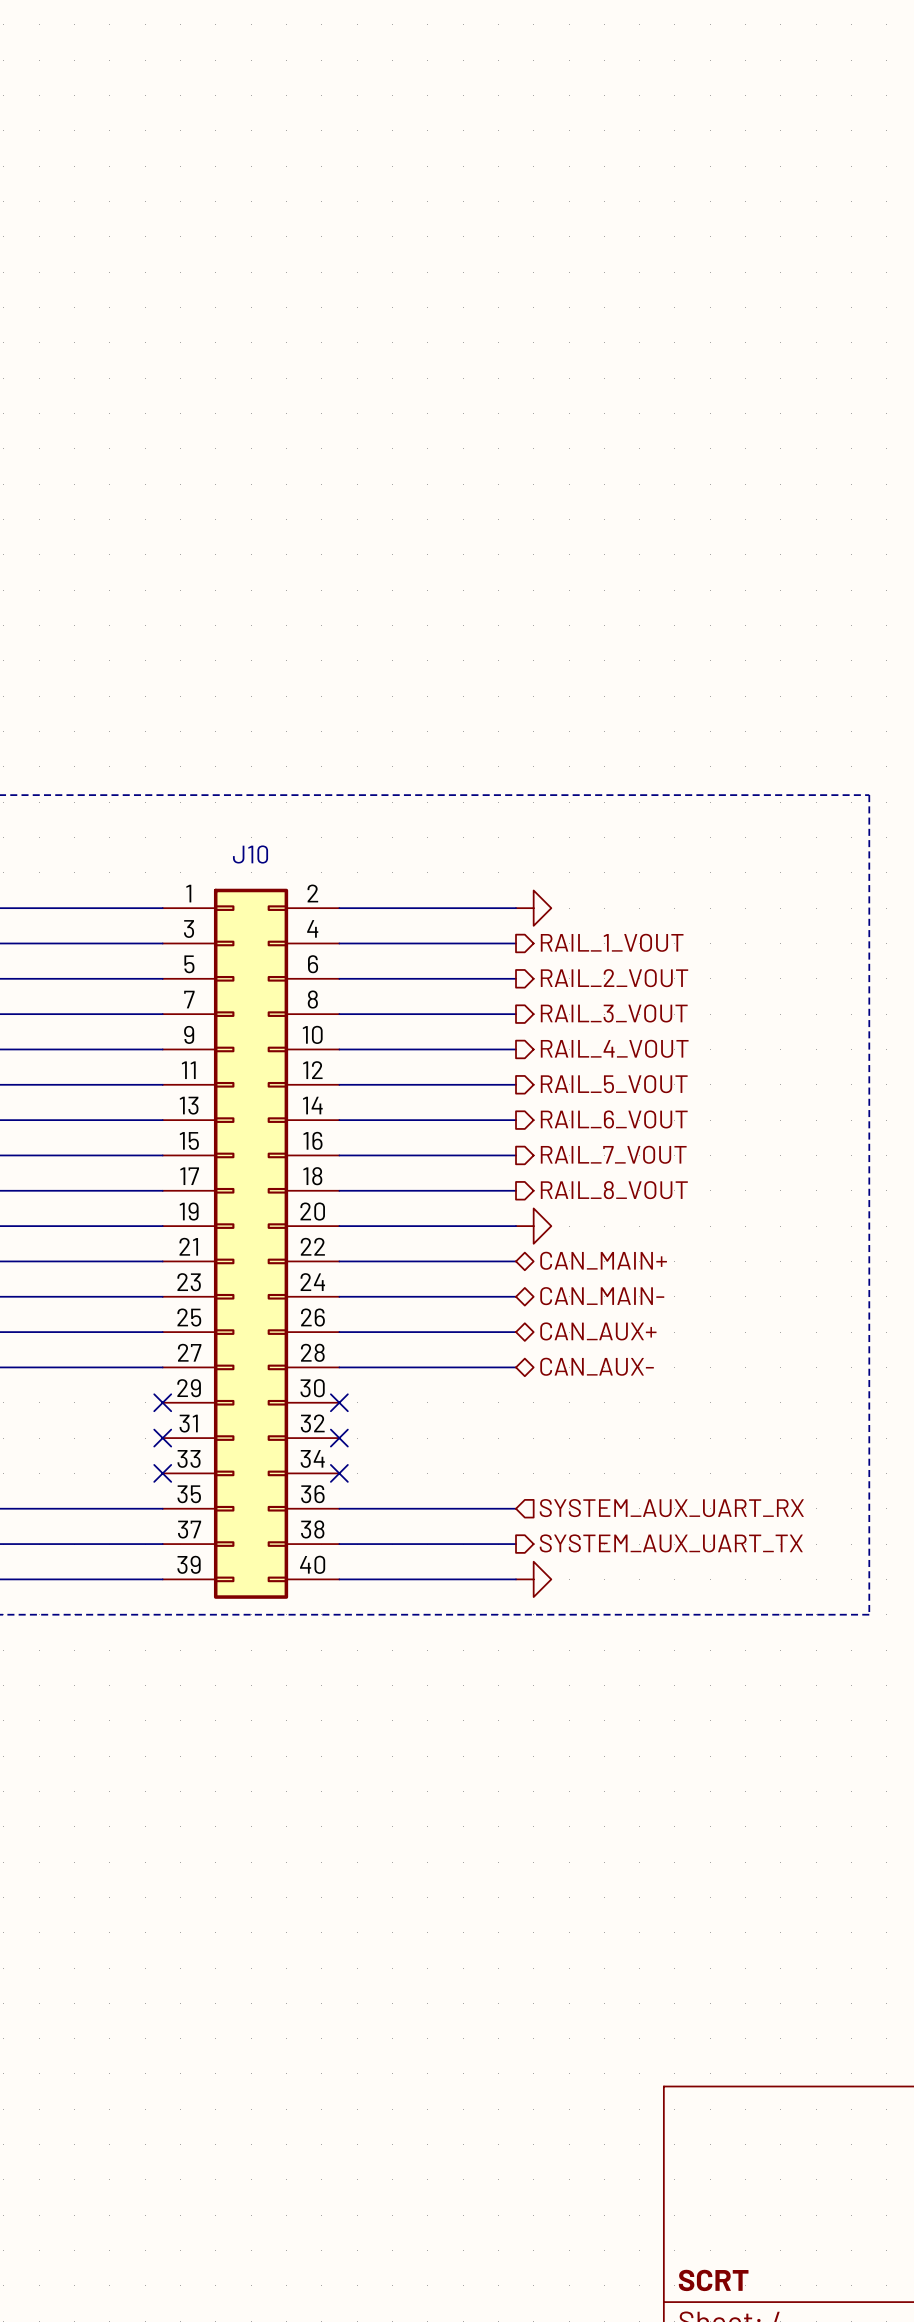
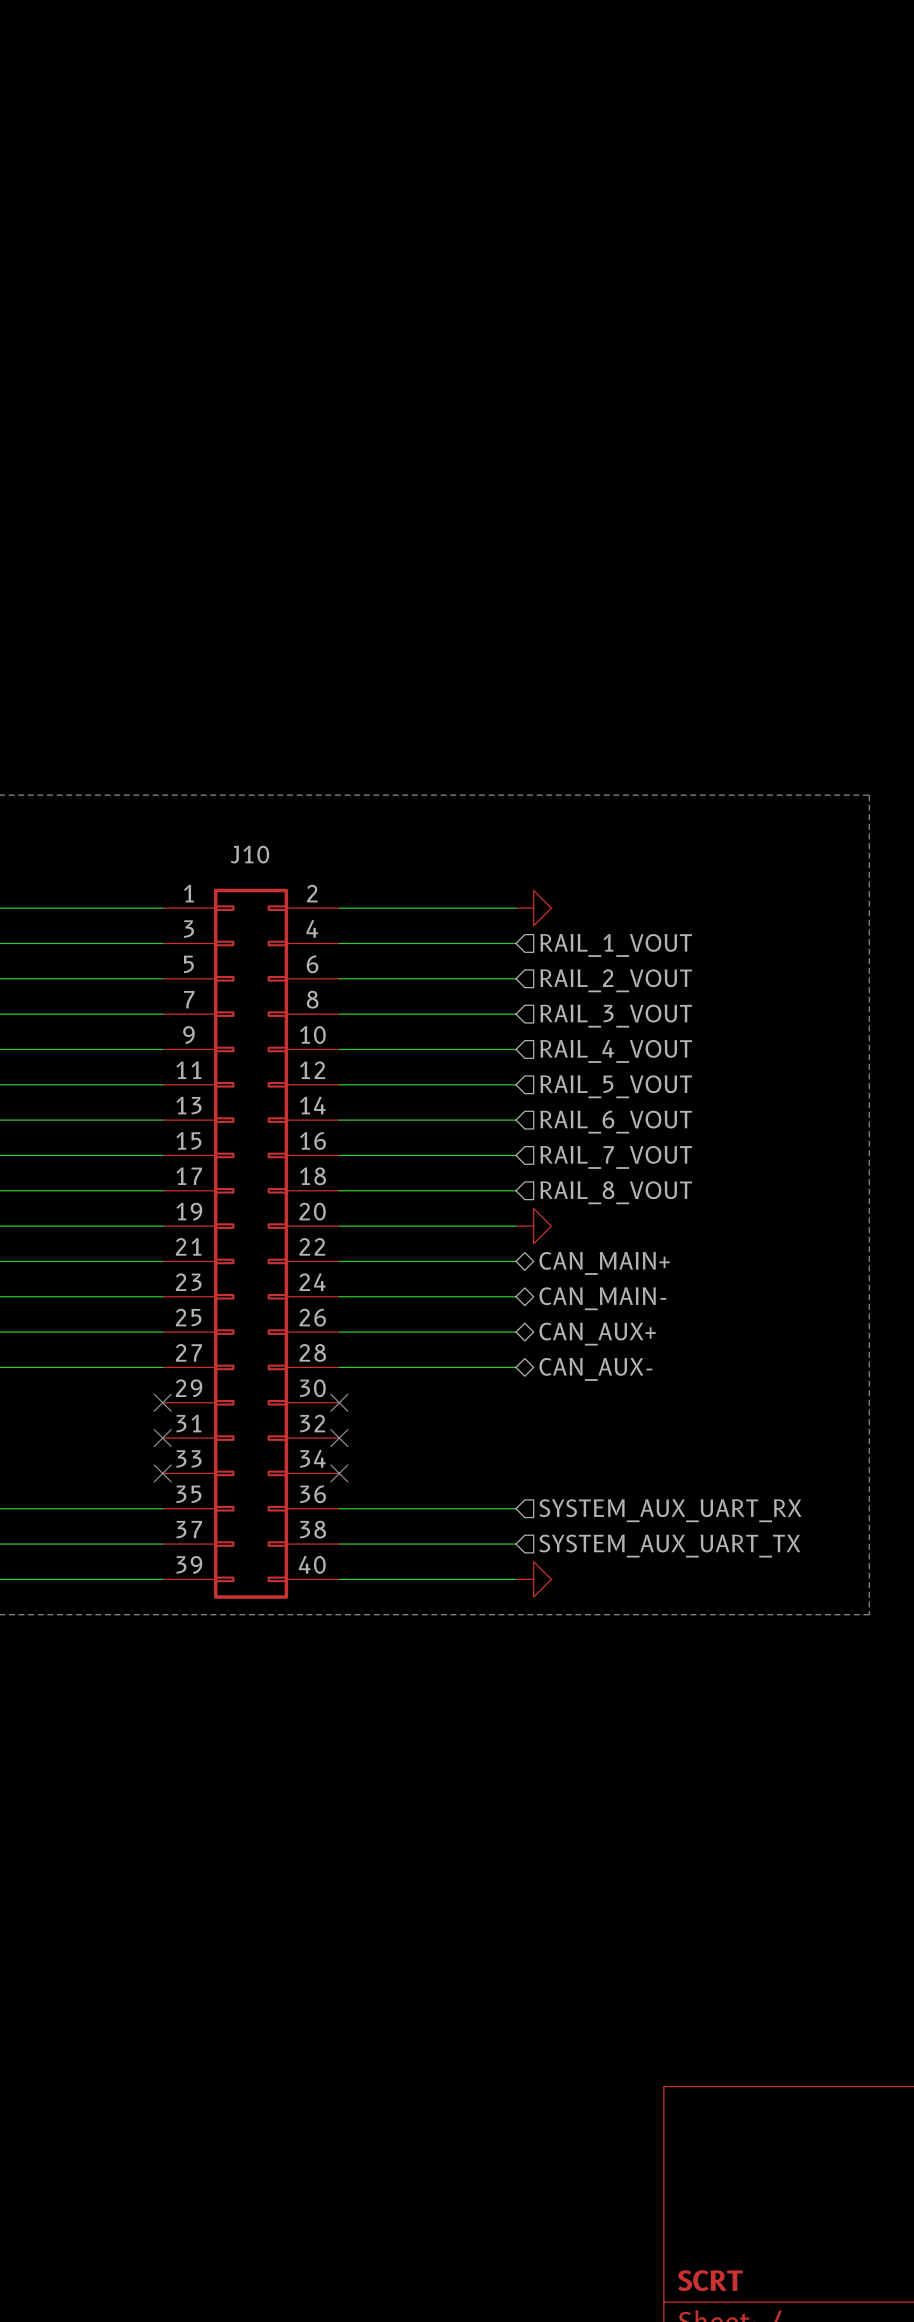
hierarchical label shape: output (612, 942) -> input (616, 945)
hierarchical label shape: output (614, 978) -> input (616, 980)
hierarchical label shape: output (614, 1013) -> input (616, 1016)
hierarchical label shape: output (614, 1048) -> input (616, 1051)
hierarchical label shape: output (614, 1084) -> input (616, 1086)
hierarchical label shape: output (614, 1119) -> input (616, 1122)
hierarchical label shape: output (613, 1154) -> input (616, 1157)
hierarchical label shape: output (614, 1190) -> input (616, 1192)
hierarchical label shape: output (671, 1543) -> input (669, 1546)

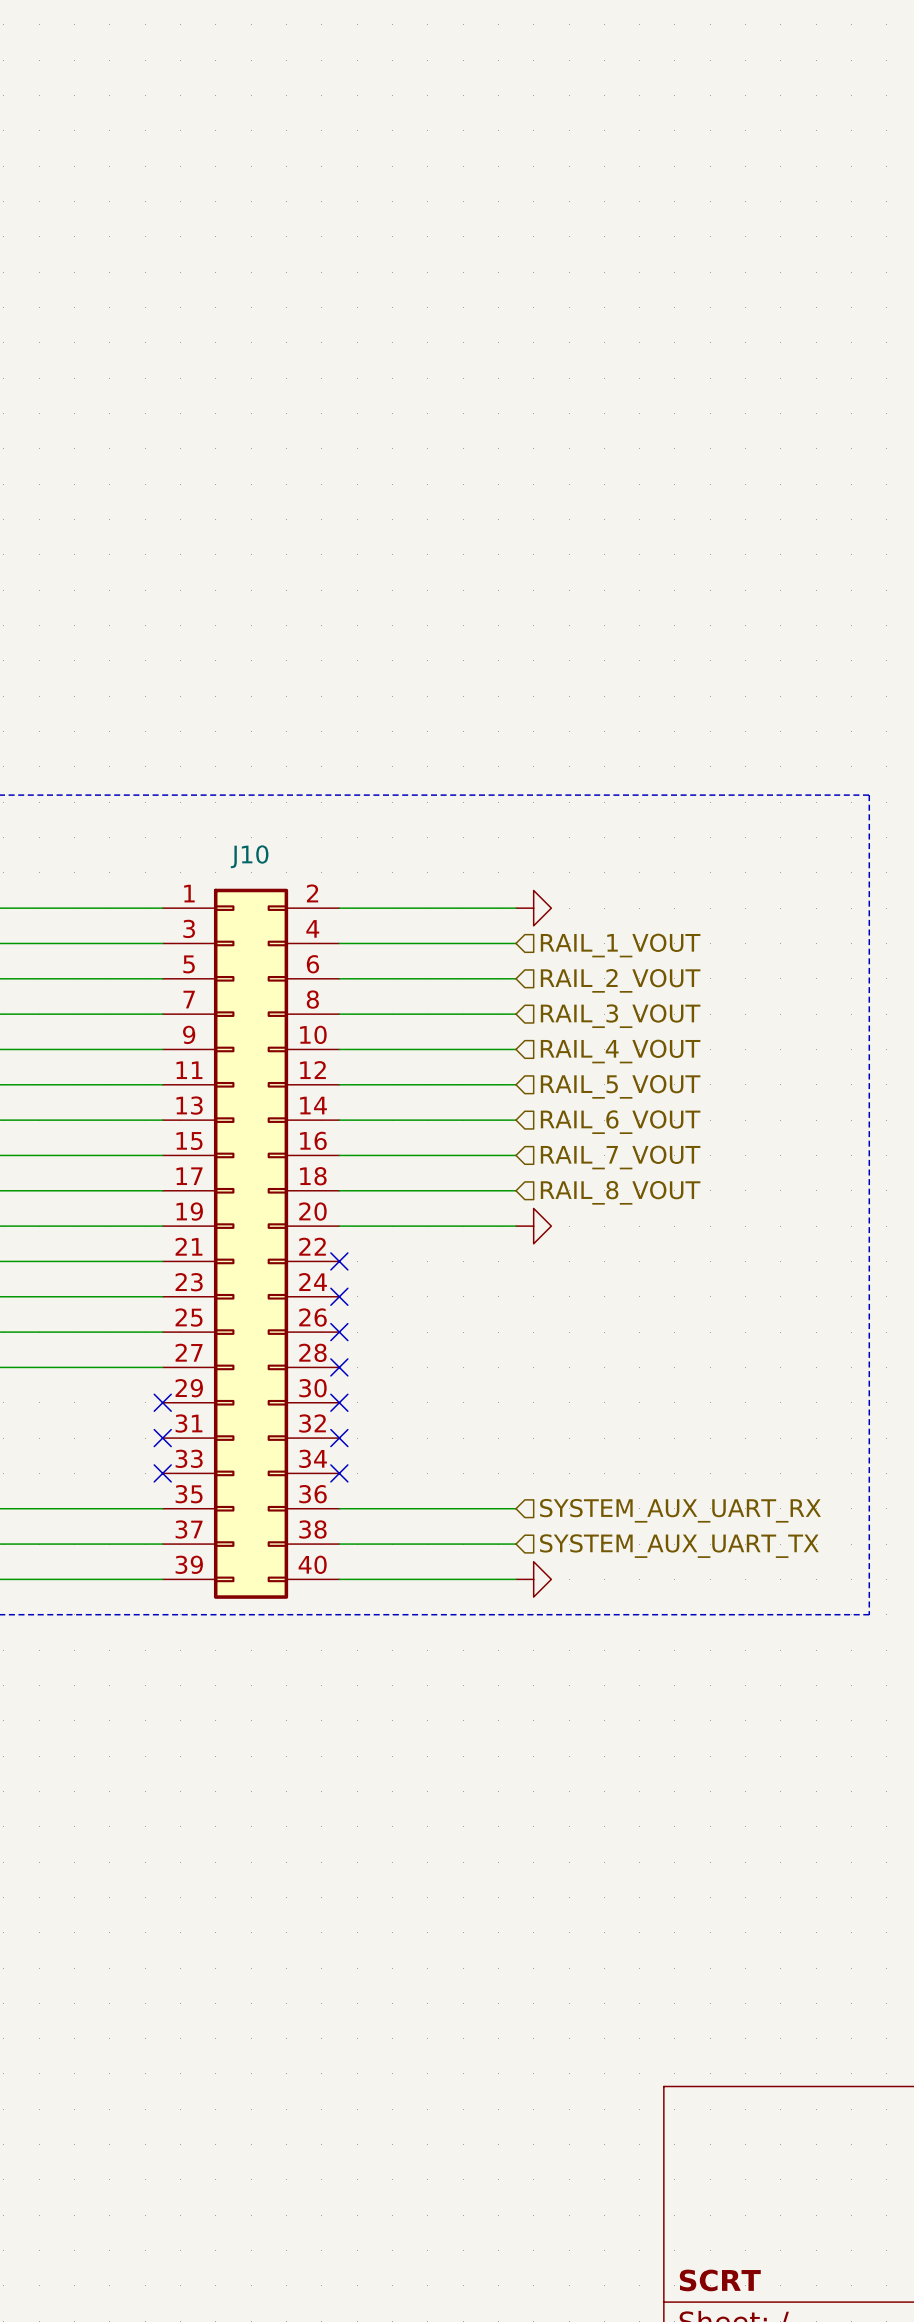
wire: (339, 1261) (516, 1261) -> none
no-connect mark: none -> (339, 1261)
hierarchical label: CAN_MAIN+ (604, 1263) -> none
wire: (339, 1296) (516, 1296) -> none
no-connect mark: none -> (339, 1296)
hierarchical label: CAN_MAIN- (602, 1298) -> none
wire: (339, 1332) (516, 1332) -> none
no-connect mark: none -> (339, 1332)
hierarchical label: CAN_AUX+ (597, 1334) -> none
wire: (339, 1367) (516, 1367) -> none
no-connect mark: none -> (339, 1367)
hierarchical label: CAN_AUX- (595, 1369) -> none

